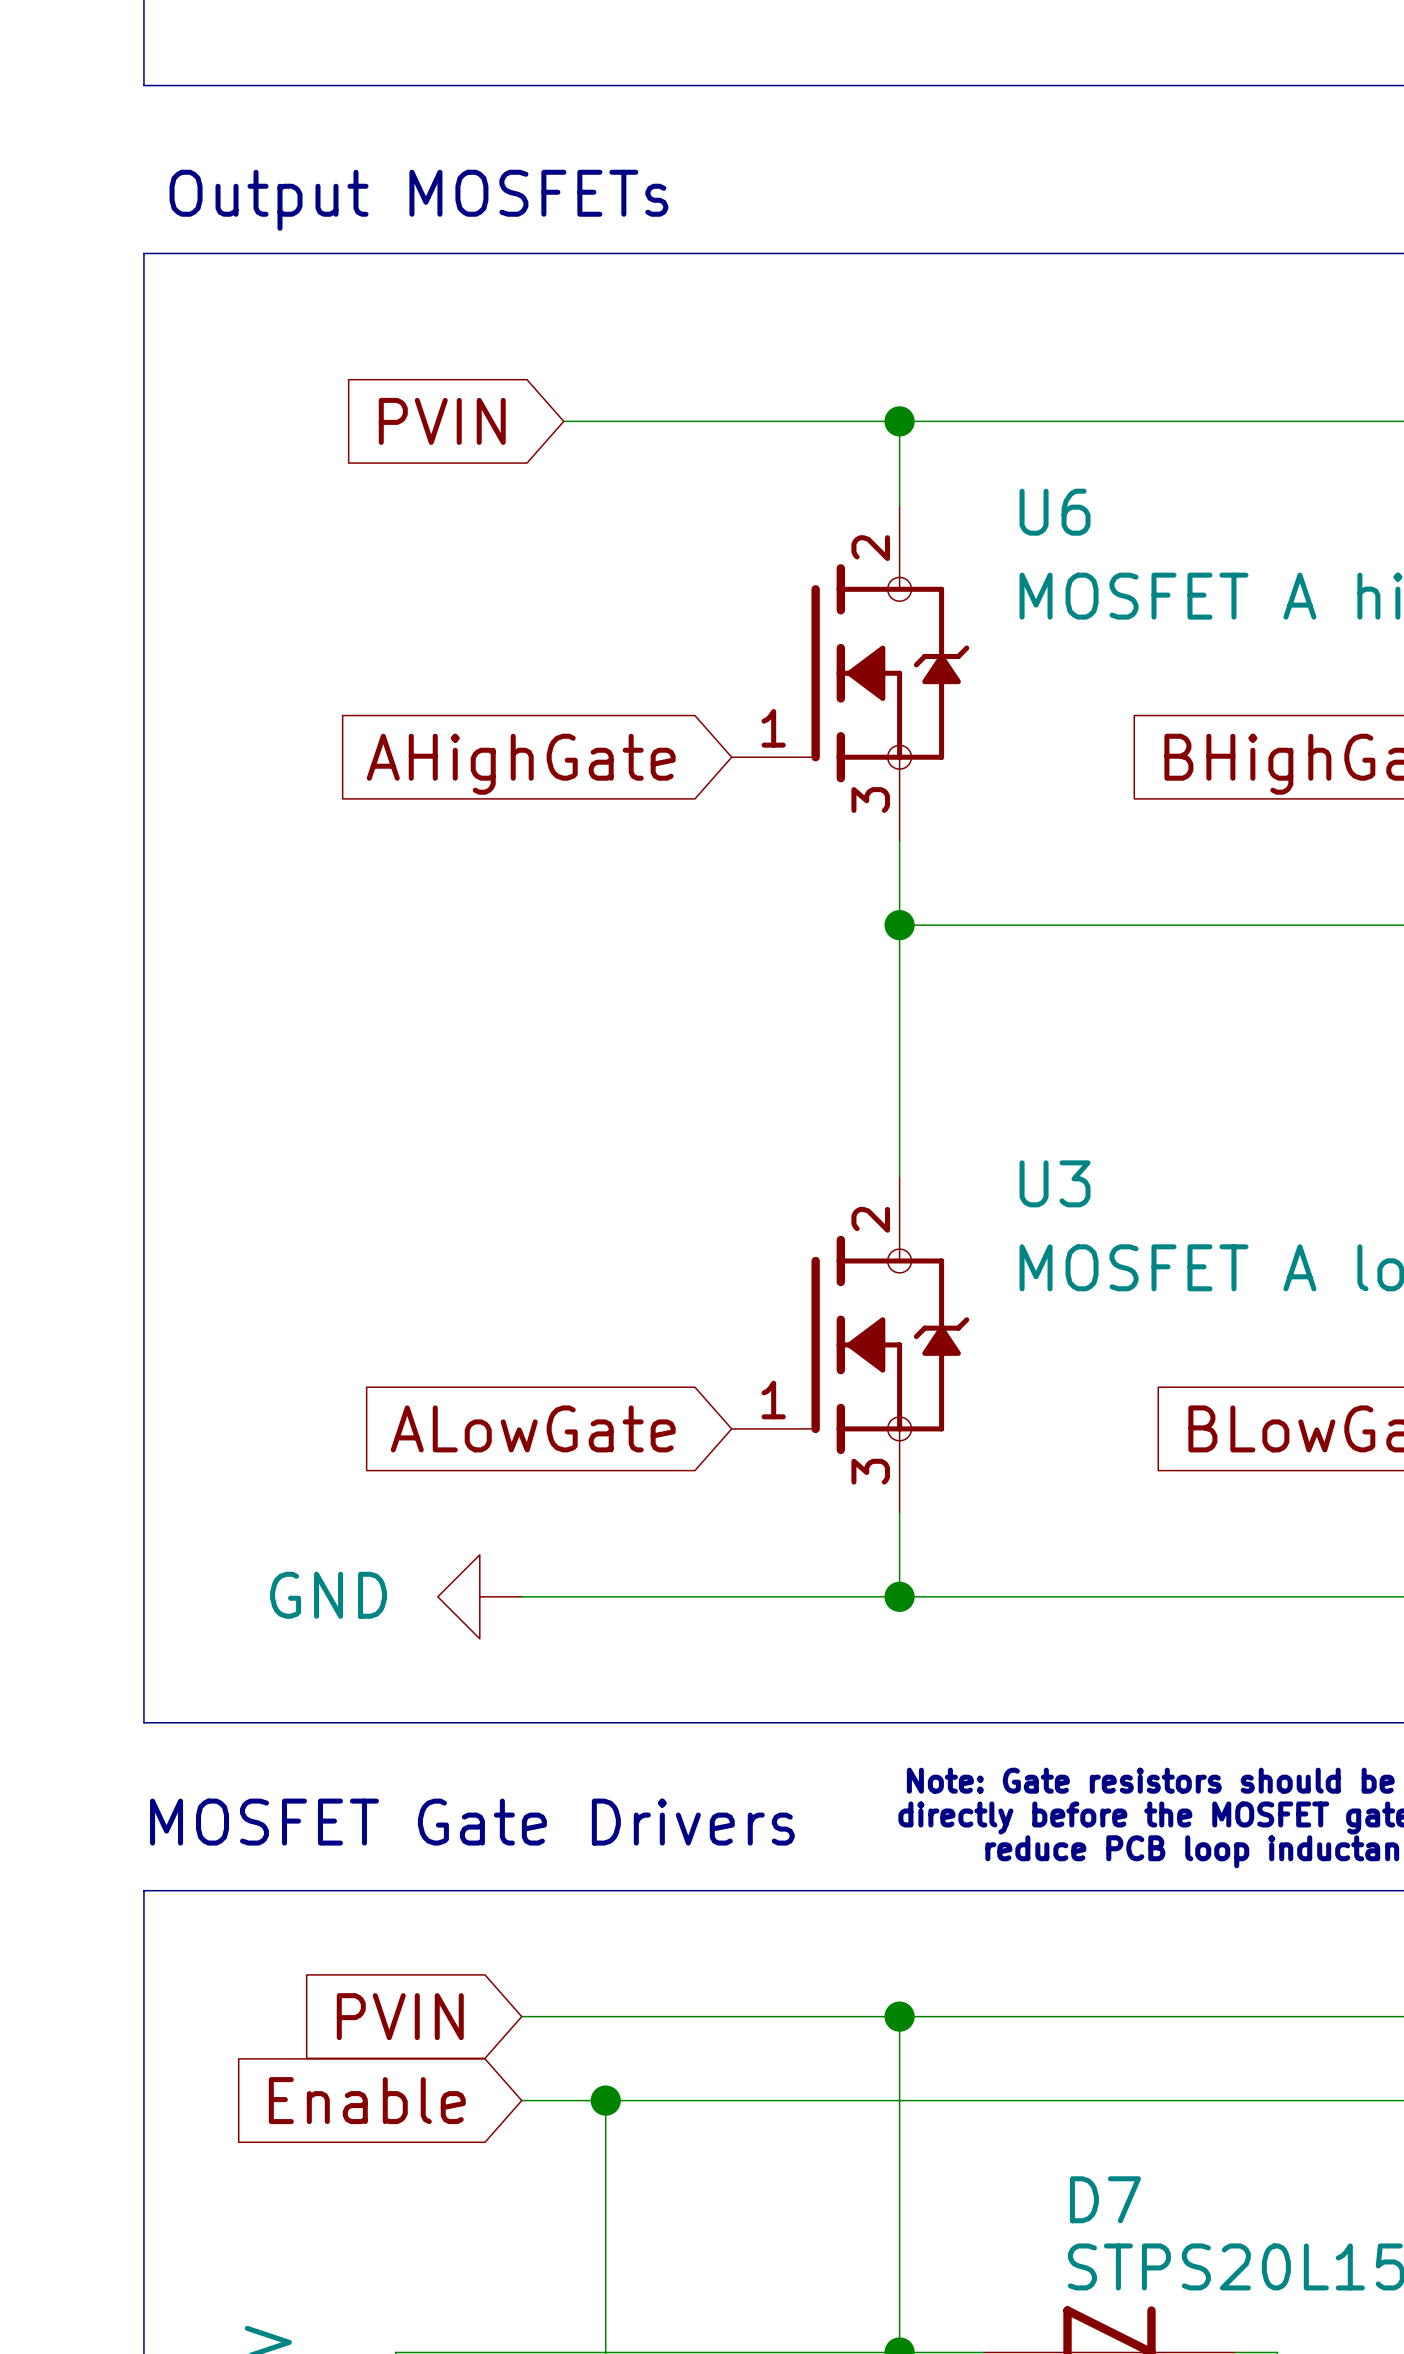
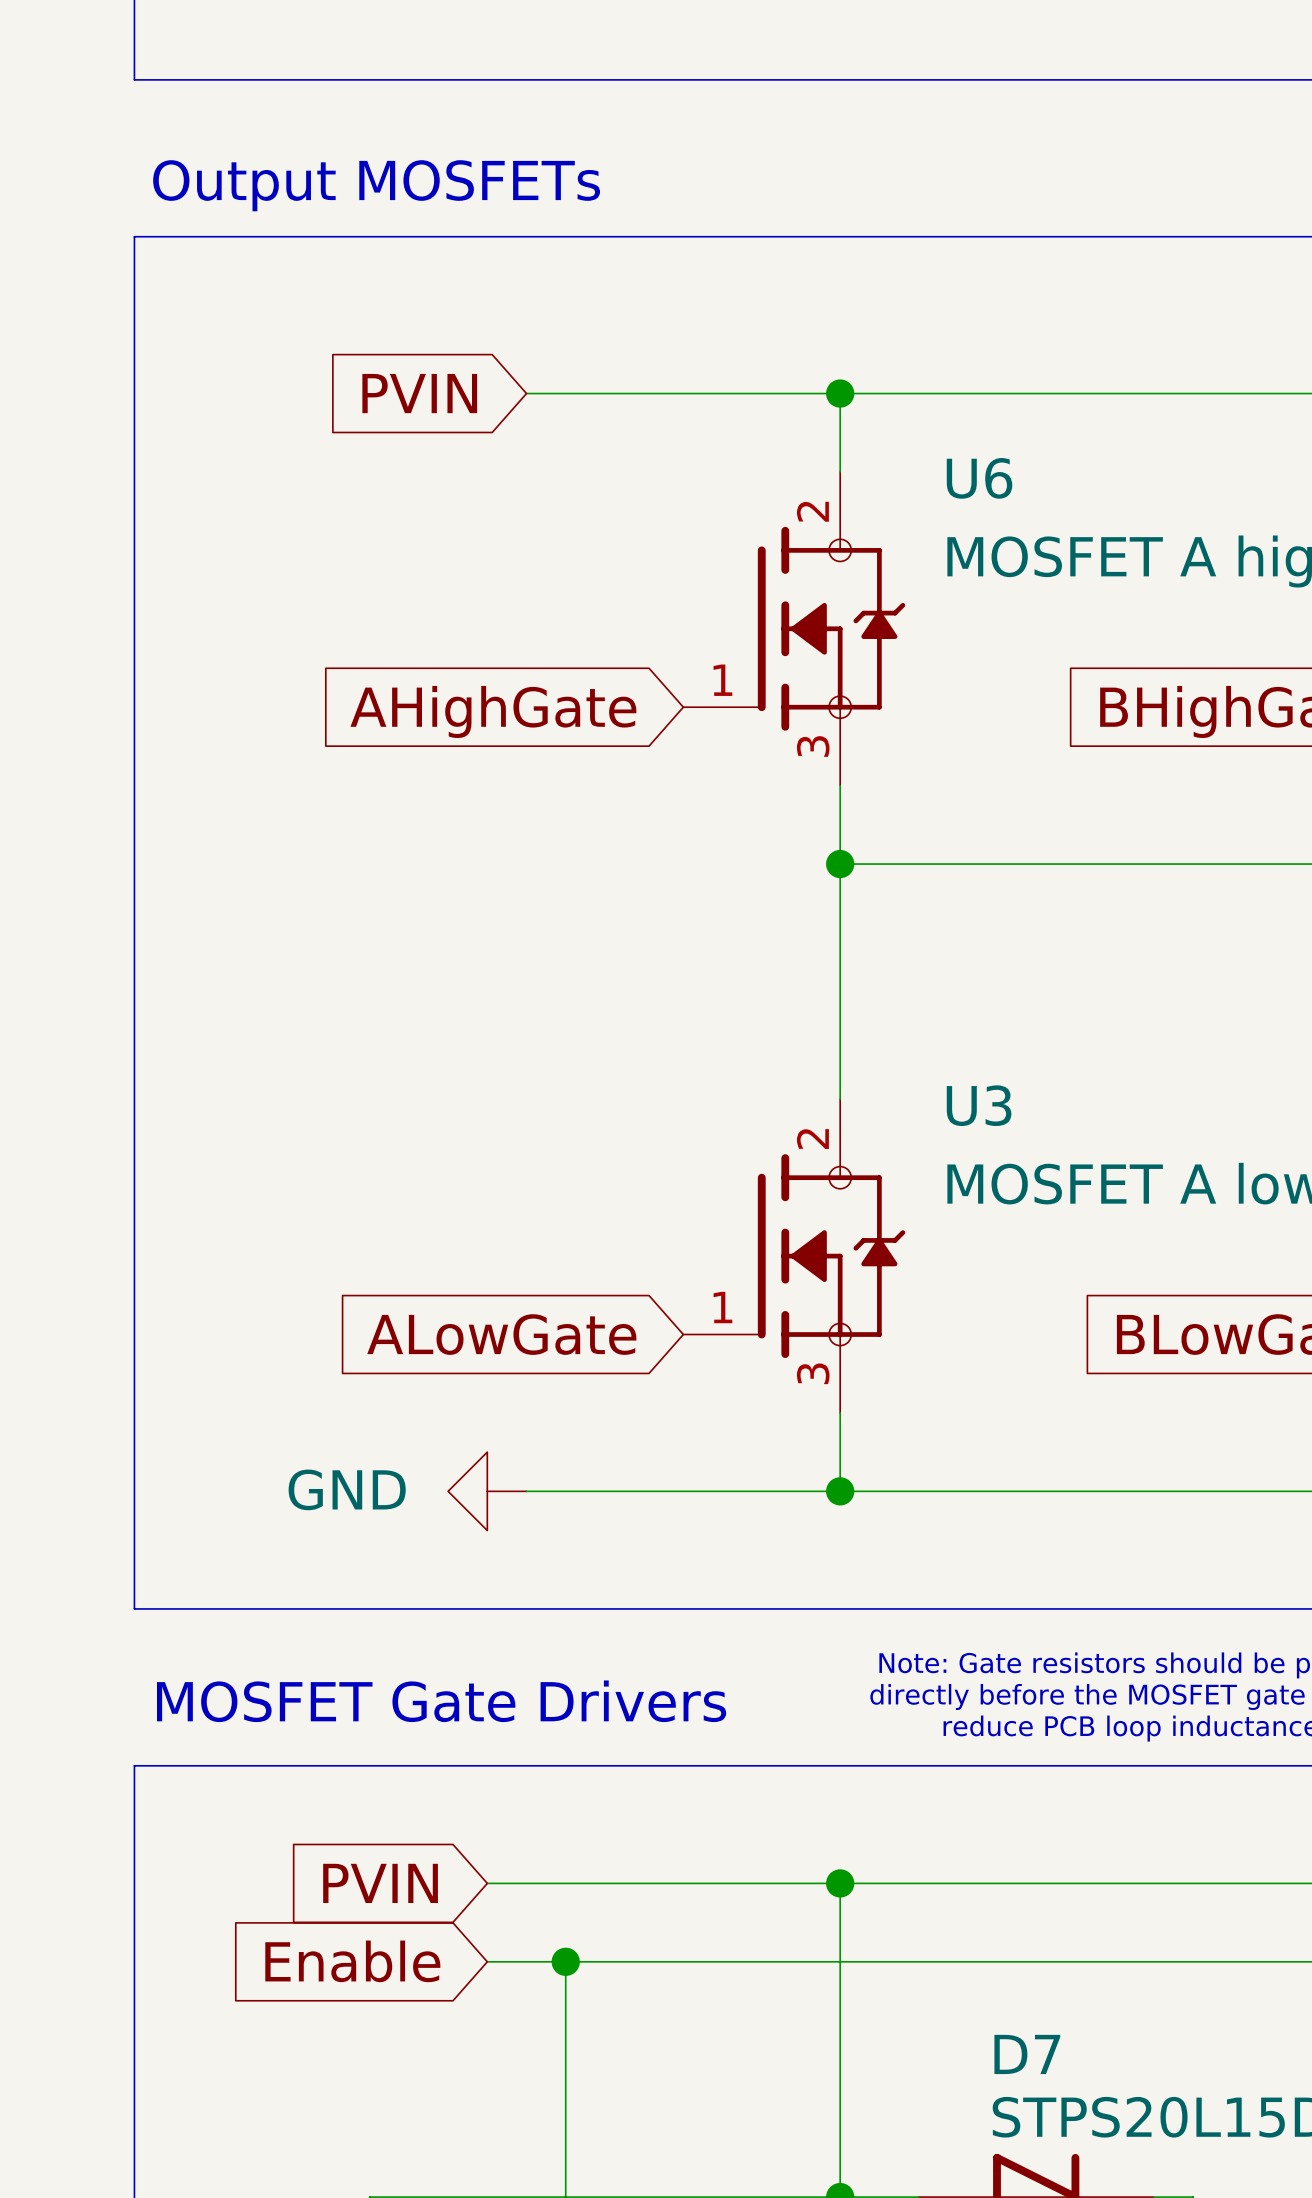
power symbol position: GND (479, 1596) -> GND (487, 1491)

